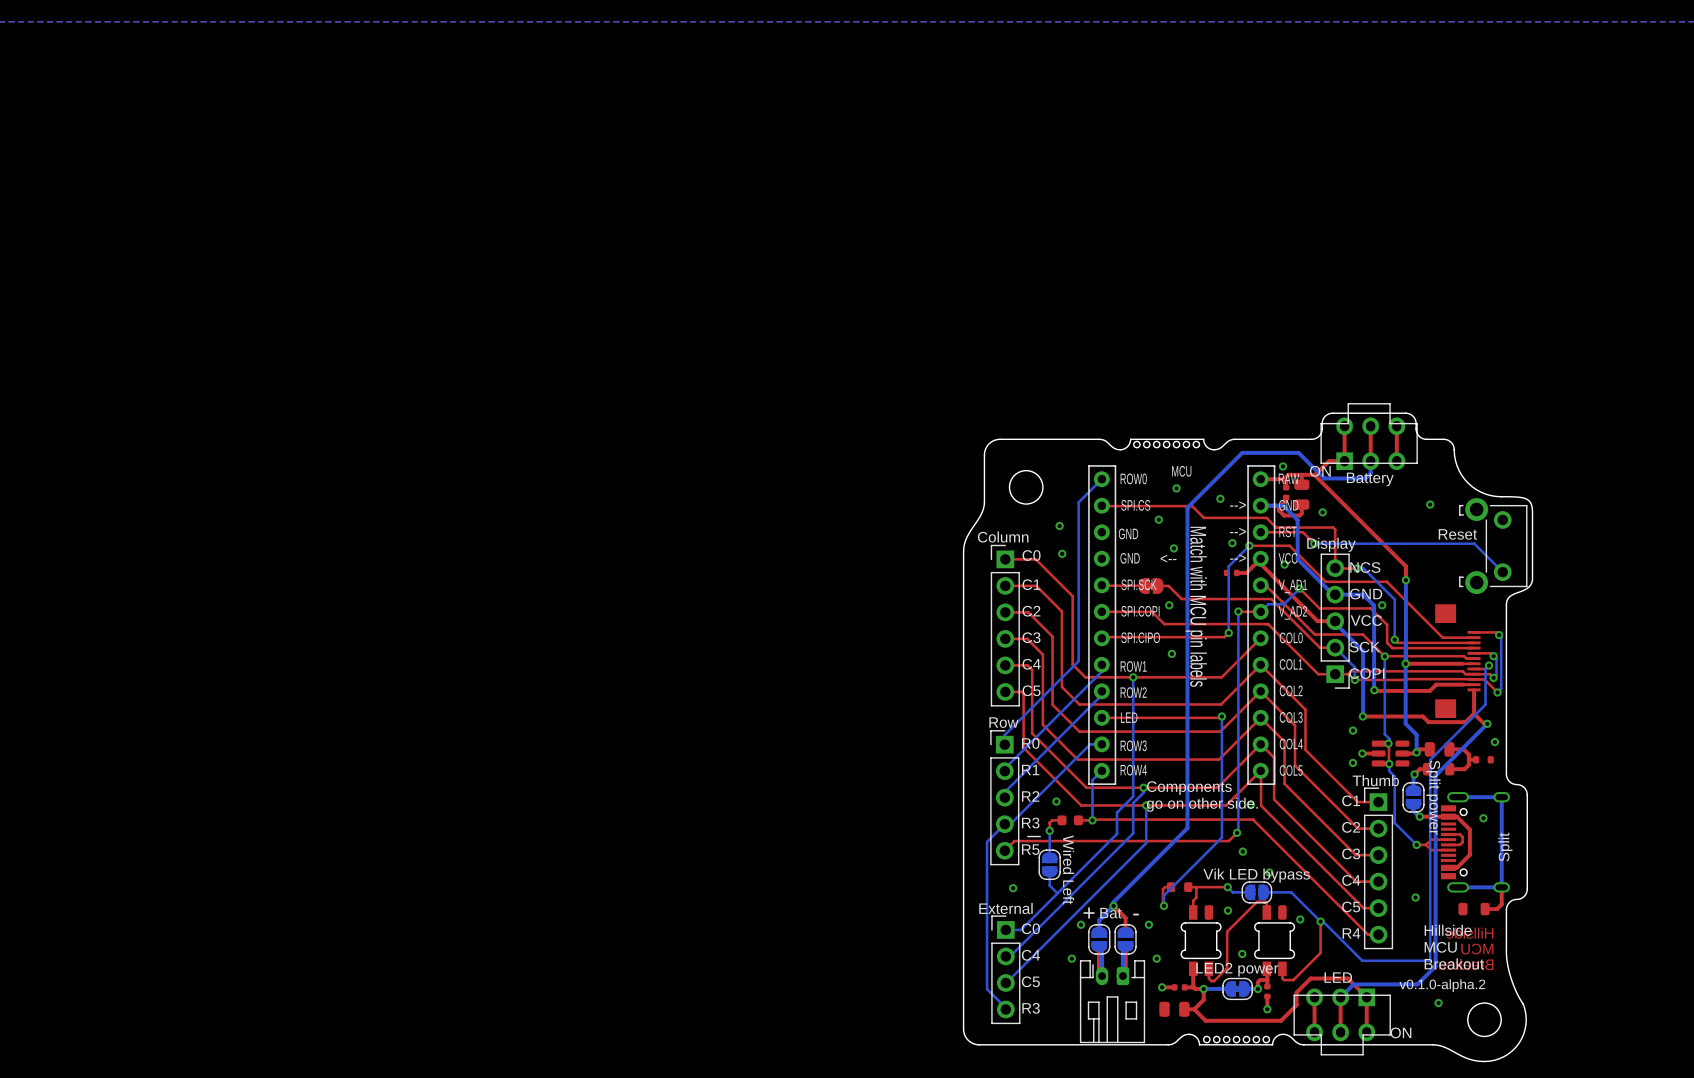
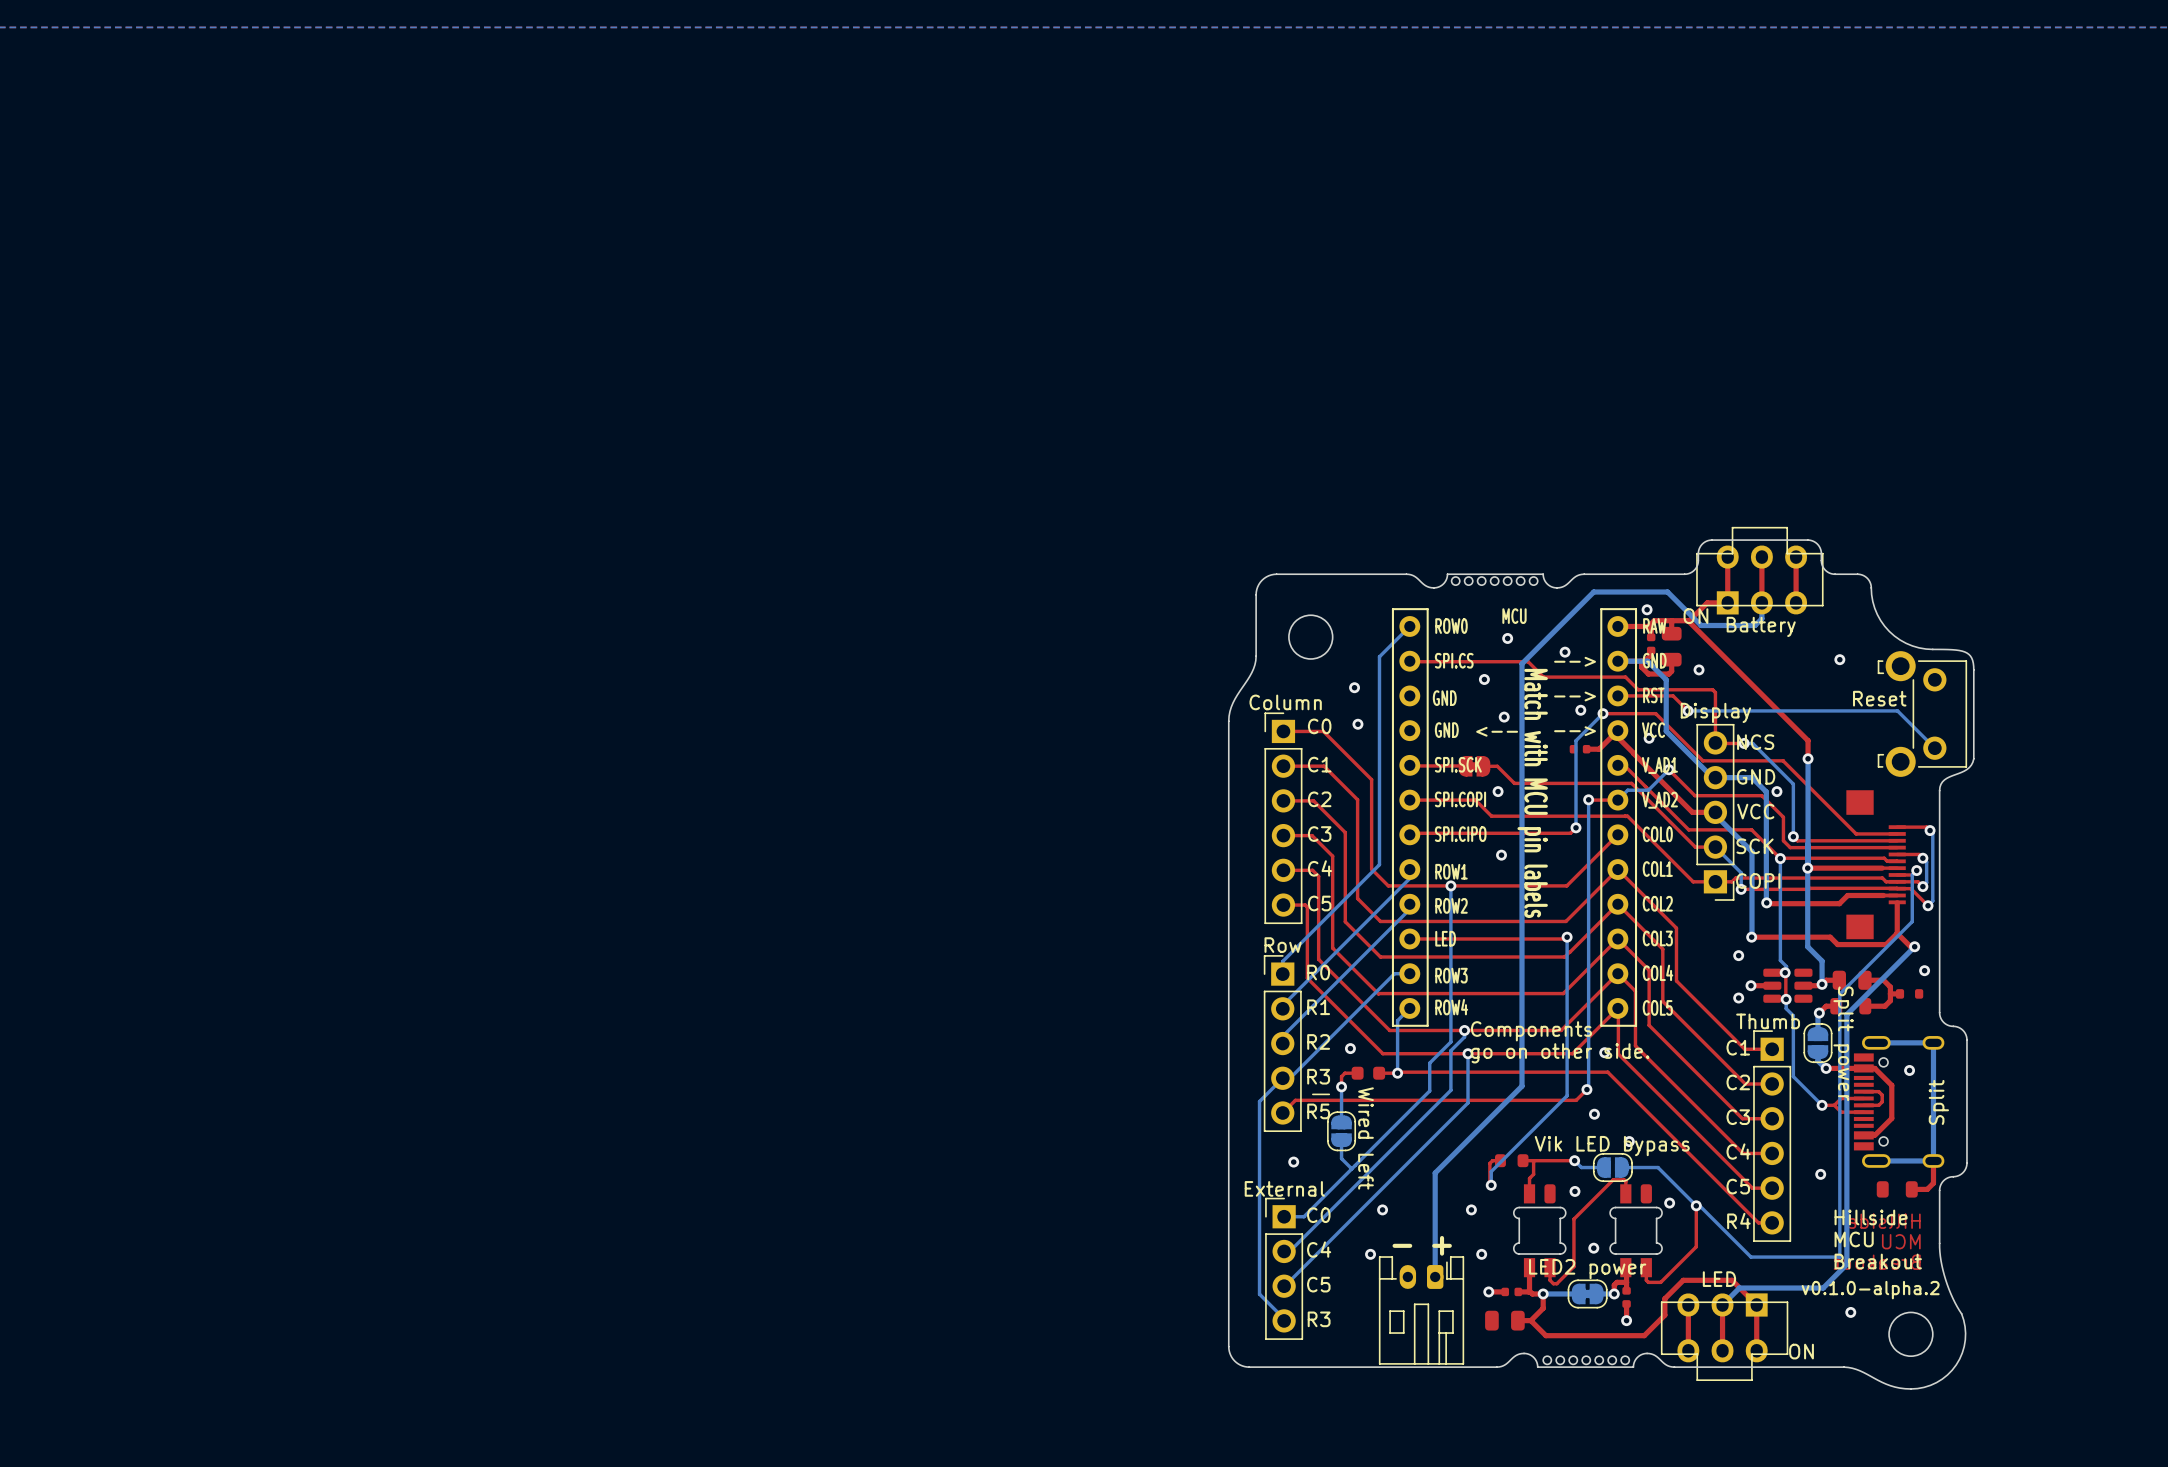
bottom track: (1187, 828) (1113, 902) (1113, 905) (1099, 920) (1099, 932) -> (1522, 1083) (1522, 1086) (1435, 1173) (1435, 1276)
top track: (1113, 905) (1125, 917) (1125, 932) -> none
via: (1113, 905) -> none
part: (1112, 983) -> none
part: none -> (1421, 1310)

